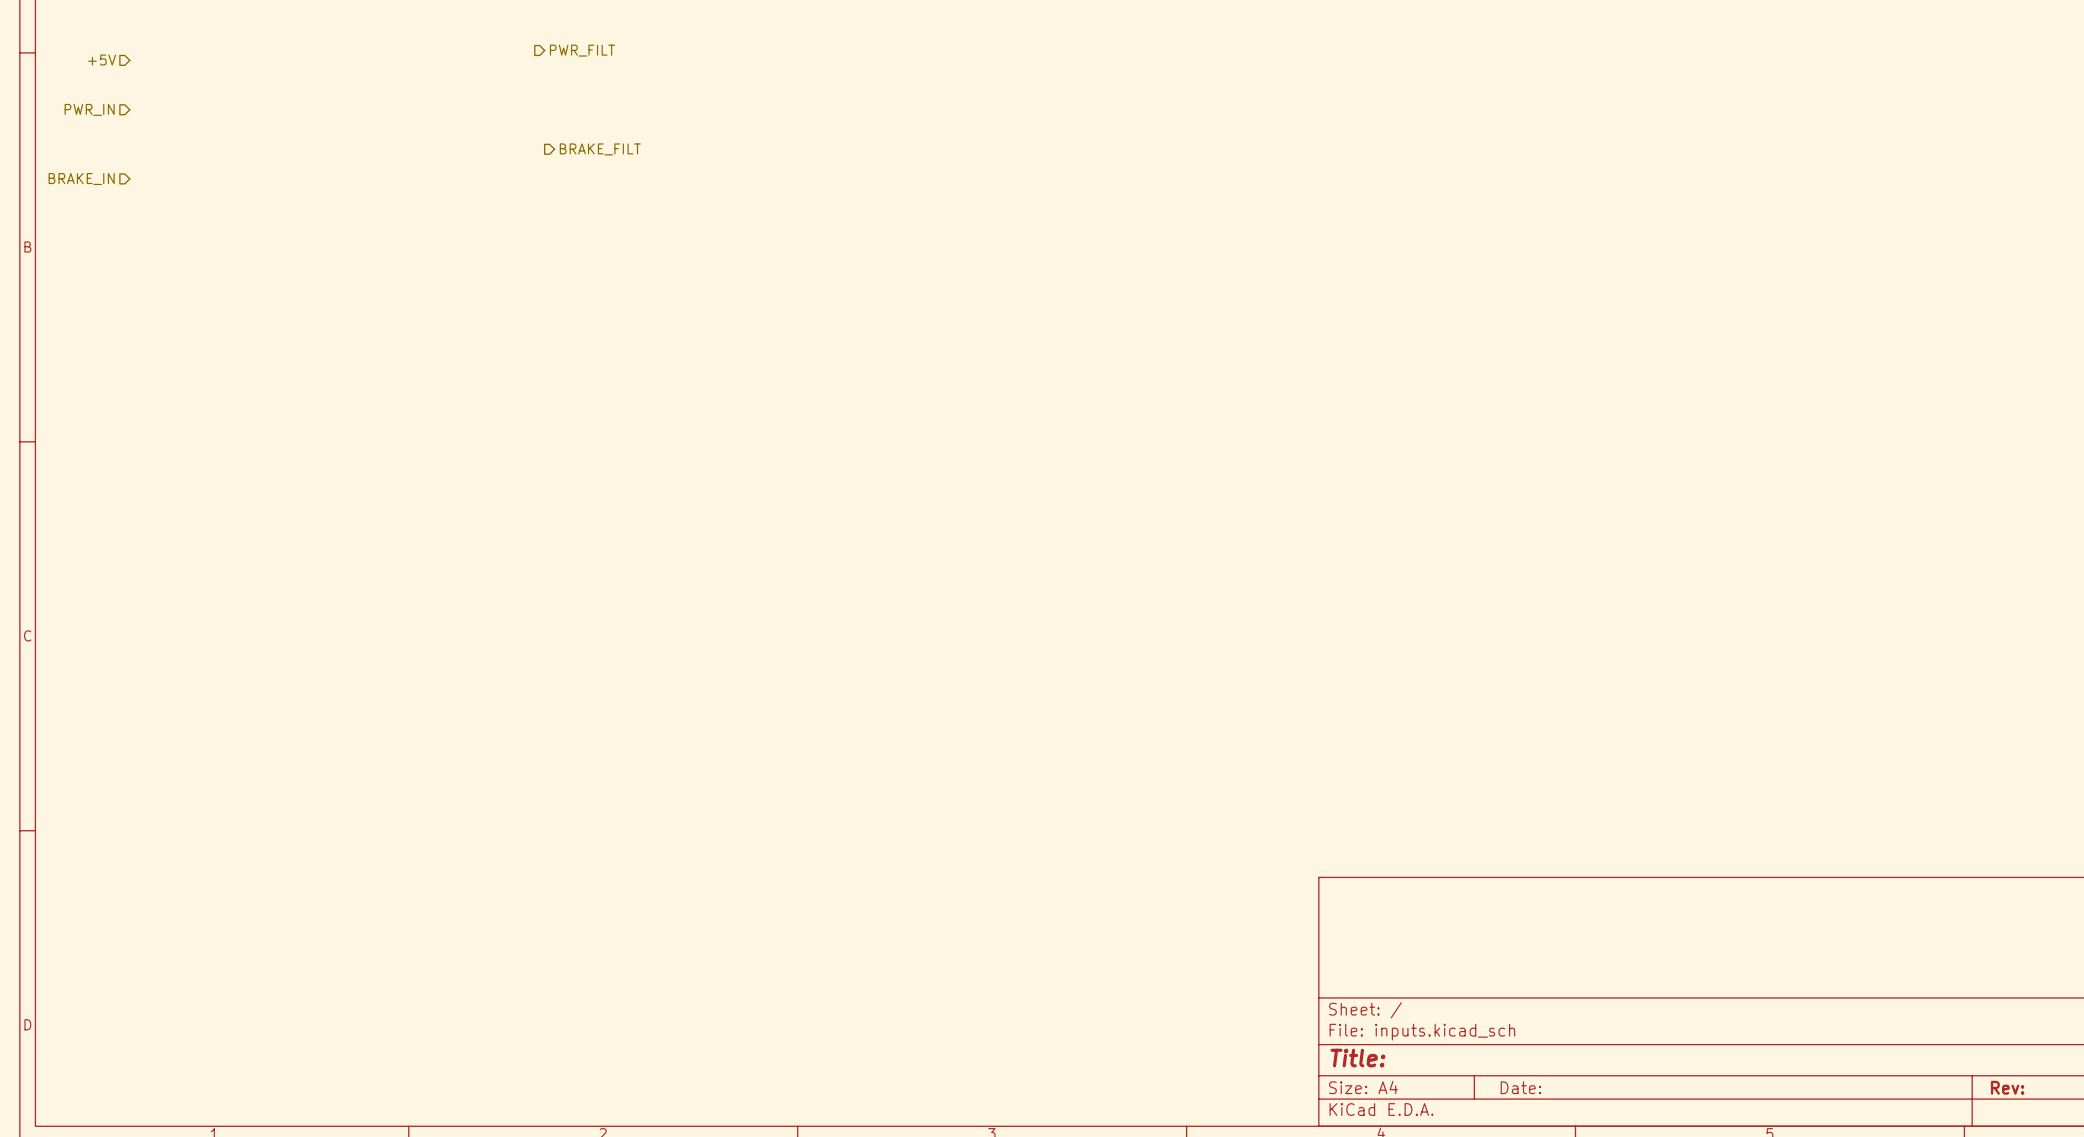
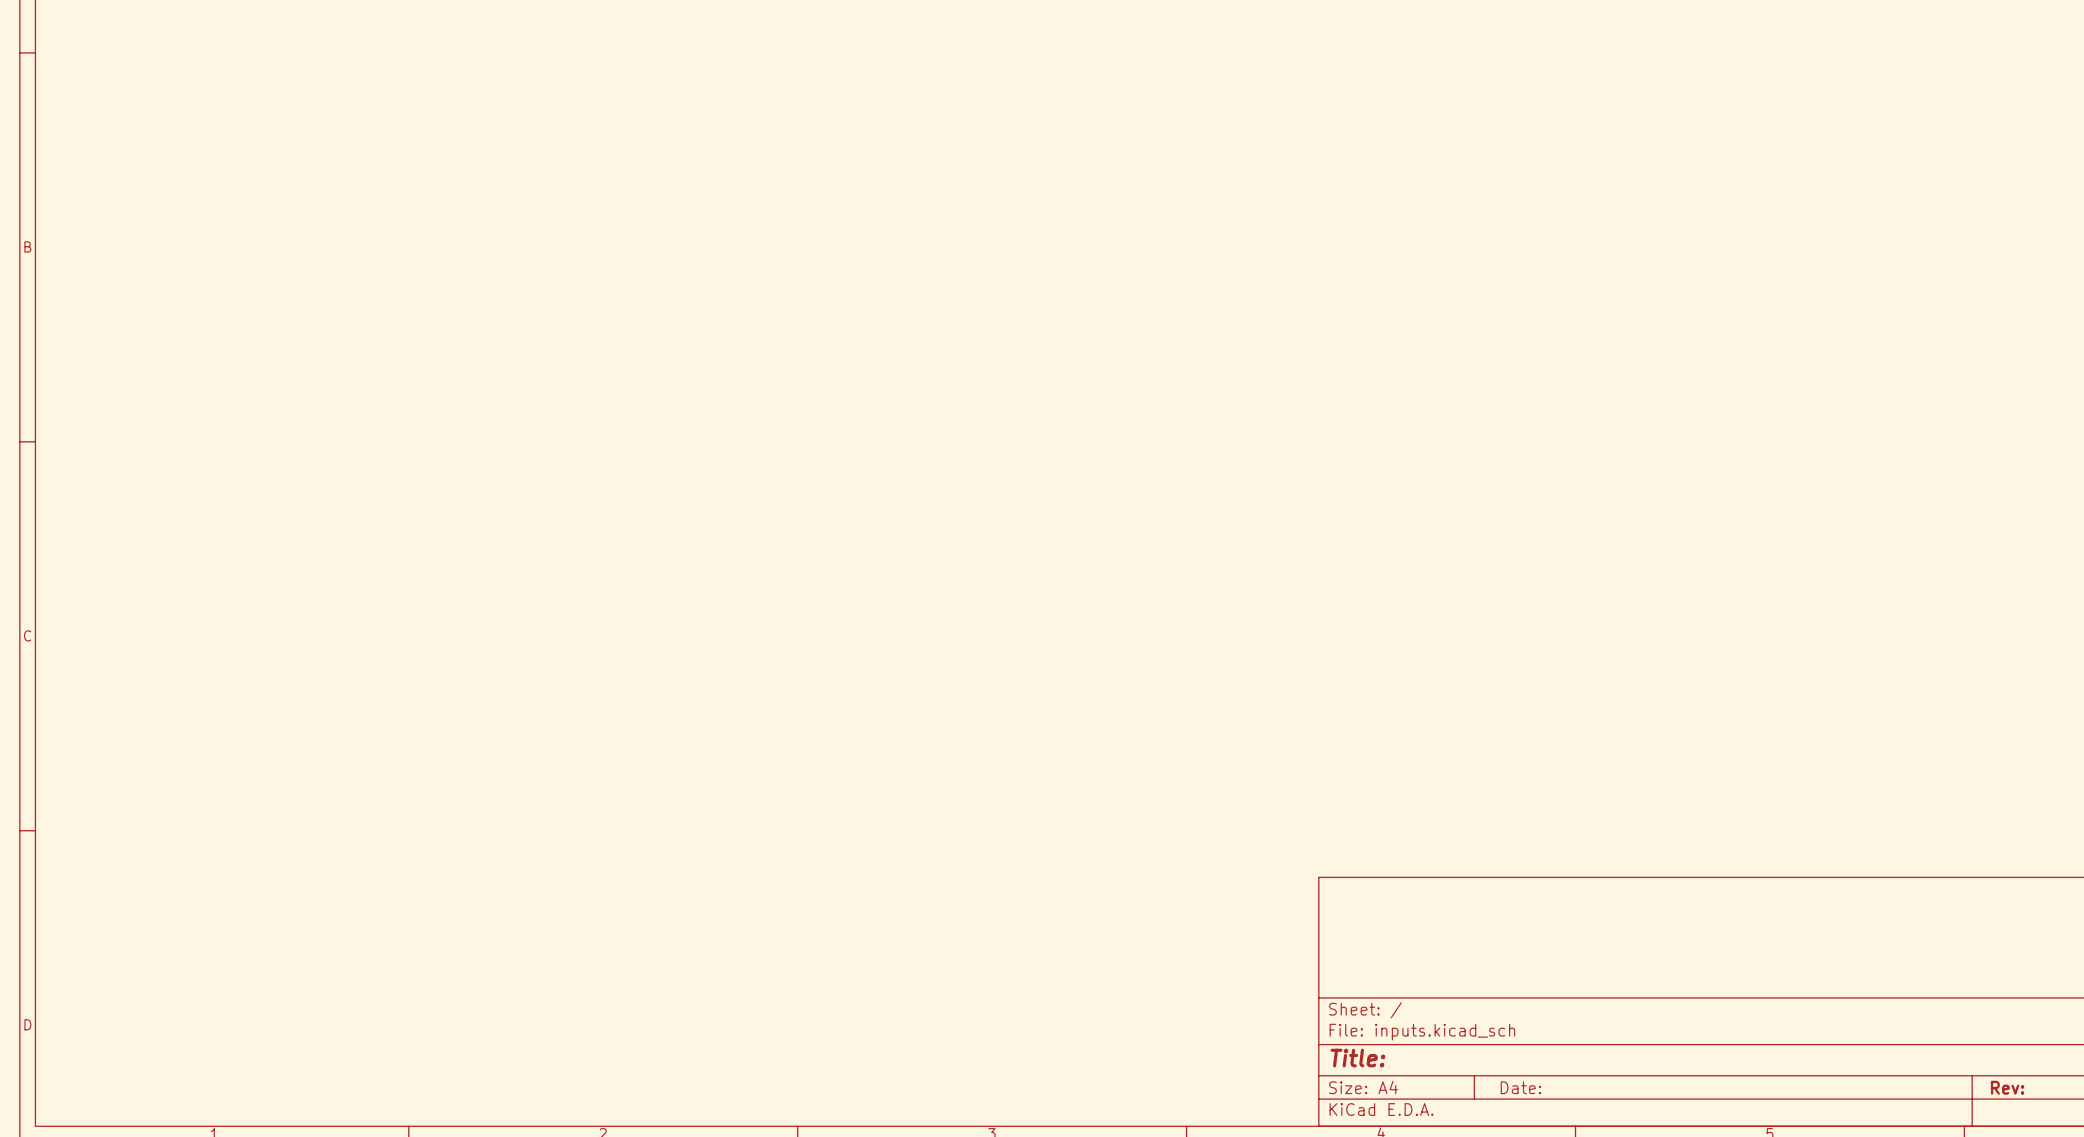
hierarchical label: PWR_FILT (582, 50) -> none
hierarchical label: +5V (102, 60) -> none
hierarchical label: PWR_IN (89, 109) -> none
hierarchical label: BRAKE_FILT (600, 149) -> none
hierarchical label: BRAKE_IN (81, 179) -> none

